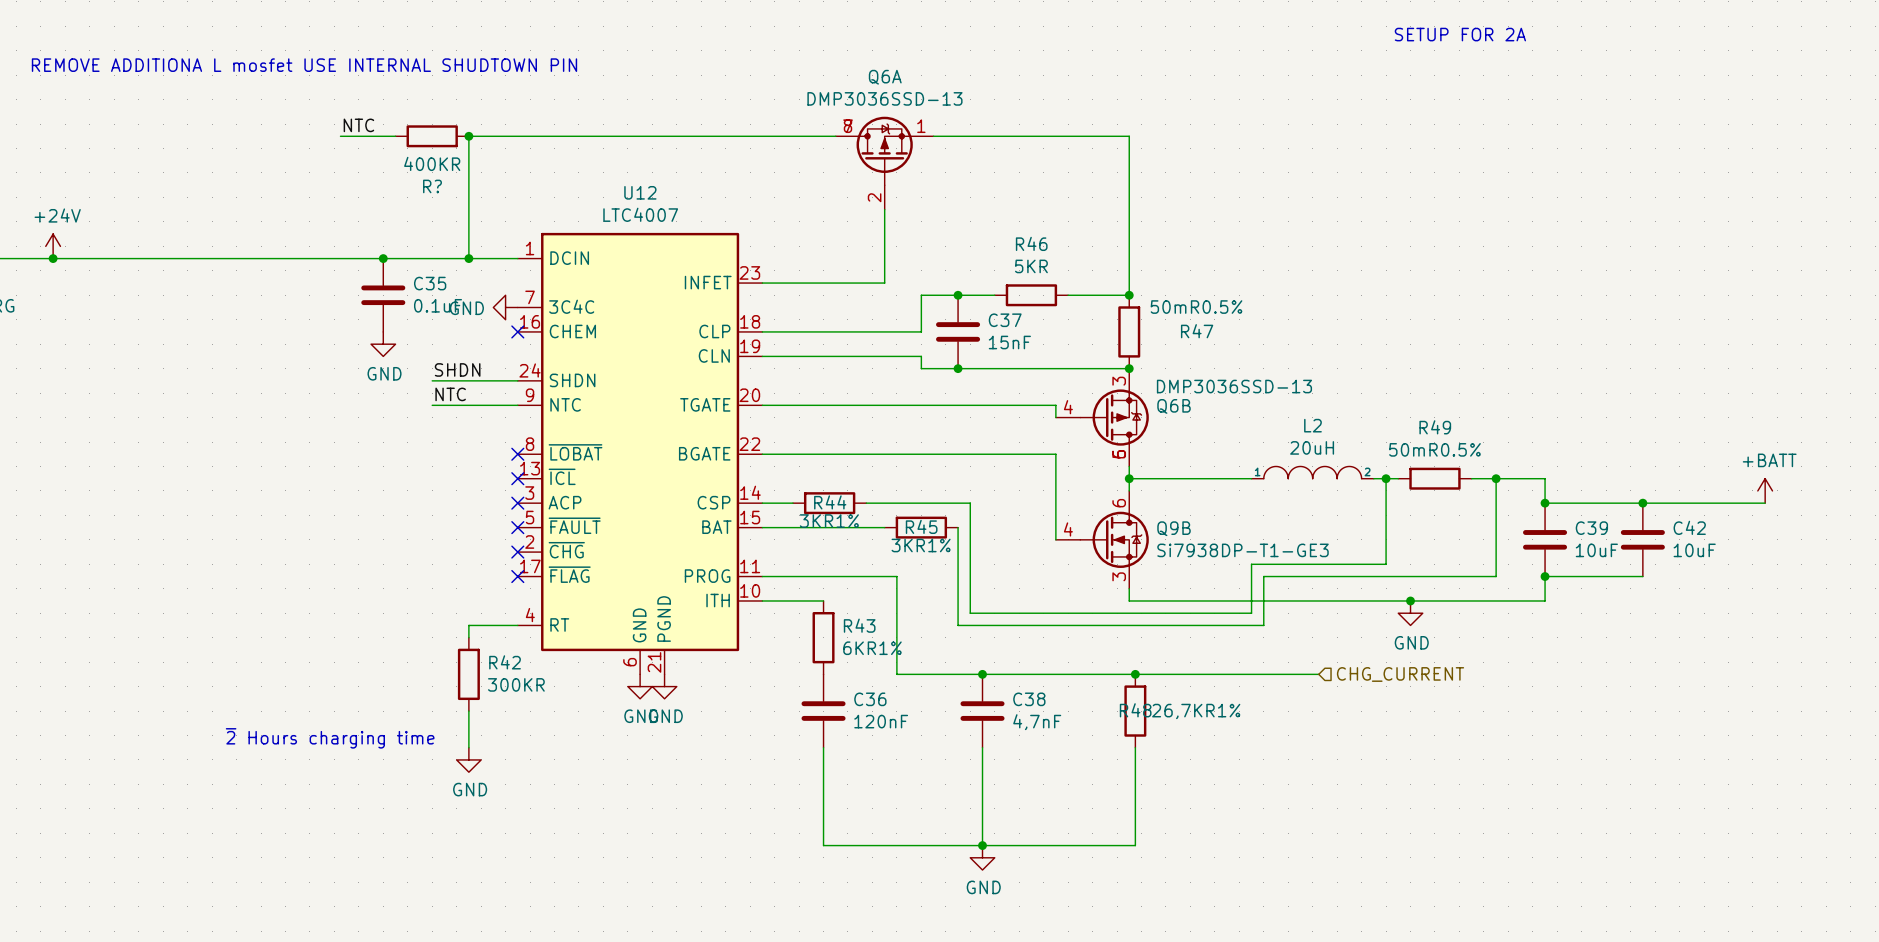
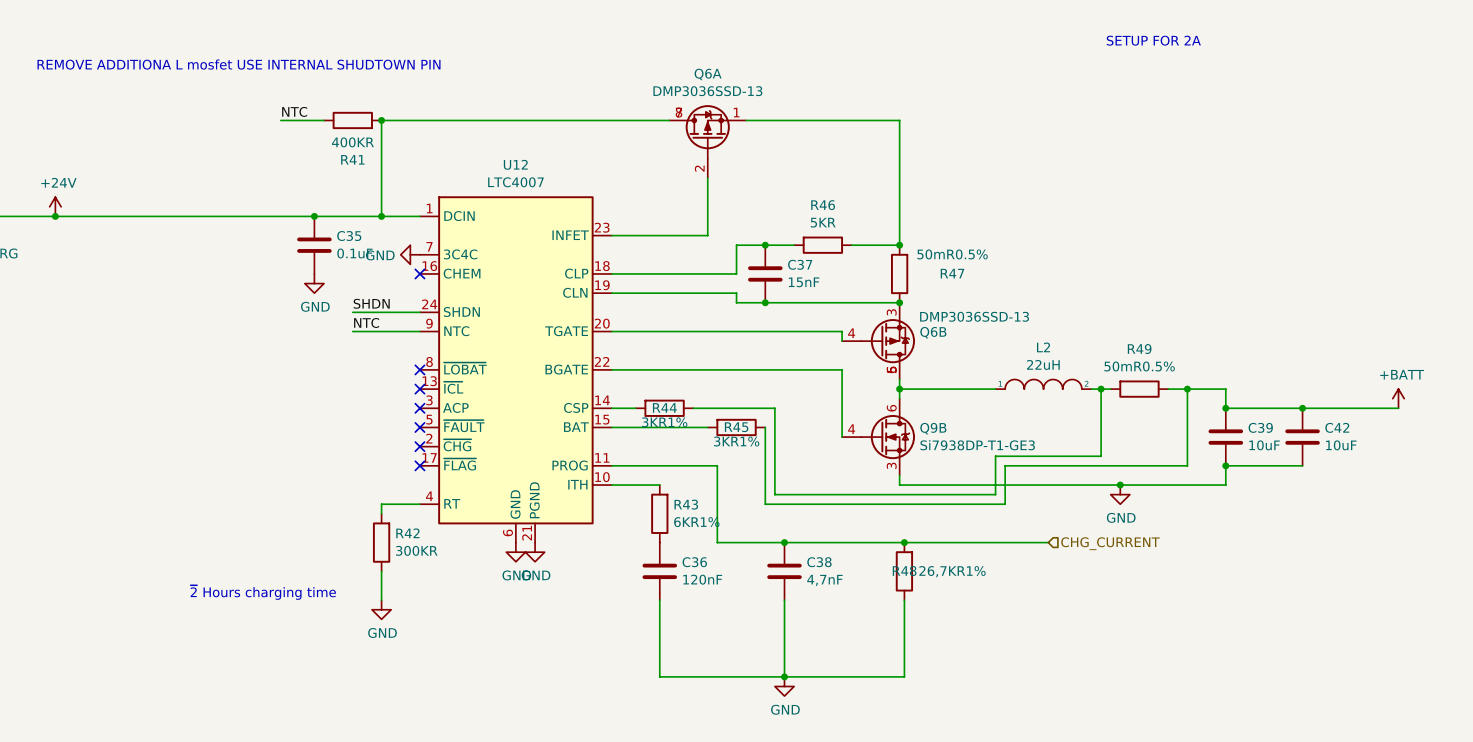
R? name: R? (432, 186) -> R41 (352, 159)
L2 value: 20uH (1312, 447) -> 22uH (1043, 364)

